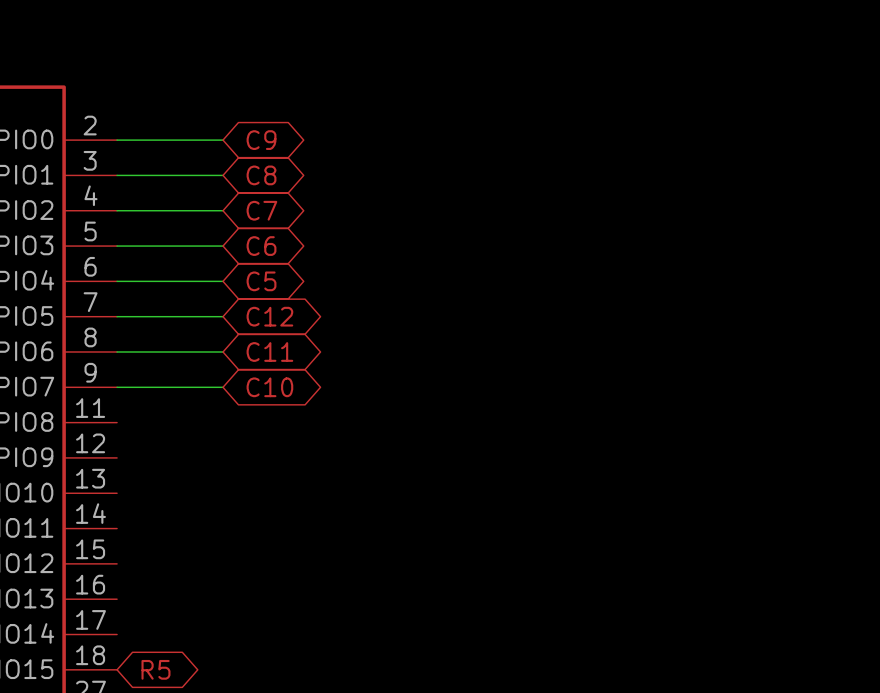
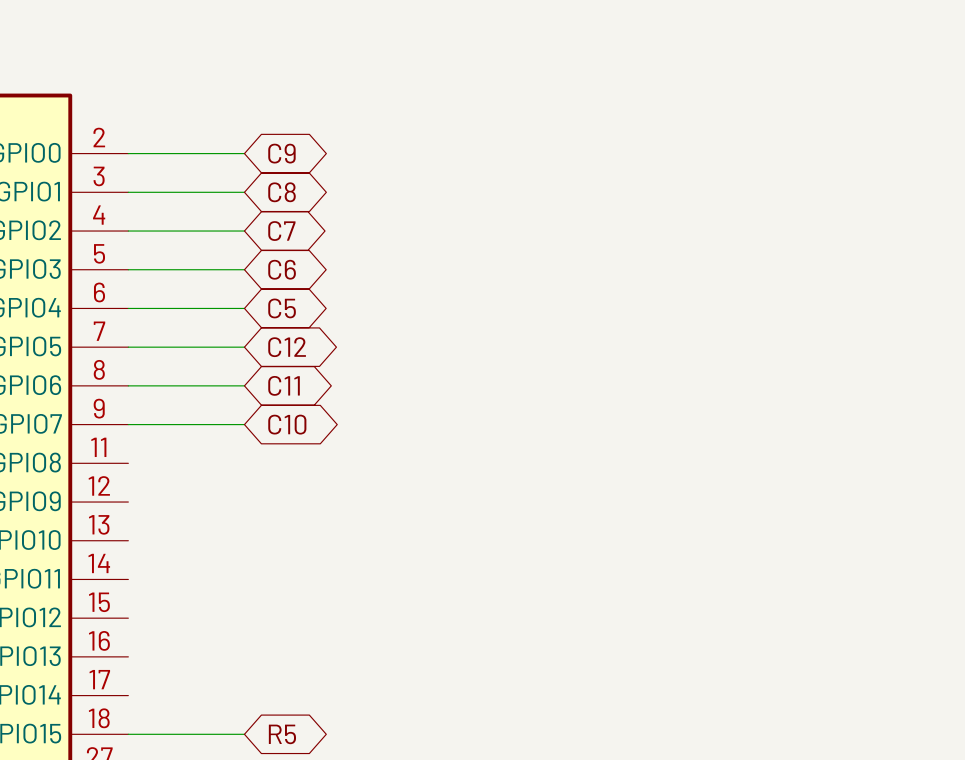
wire: none -> (128, 734) (244, 734)
global label position: R5 (155, 669) -> R5 (282, 734)

